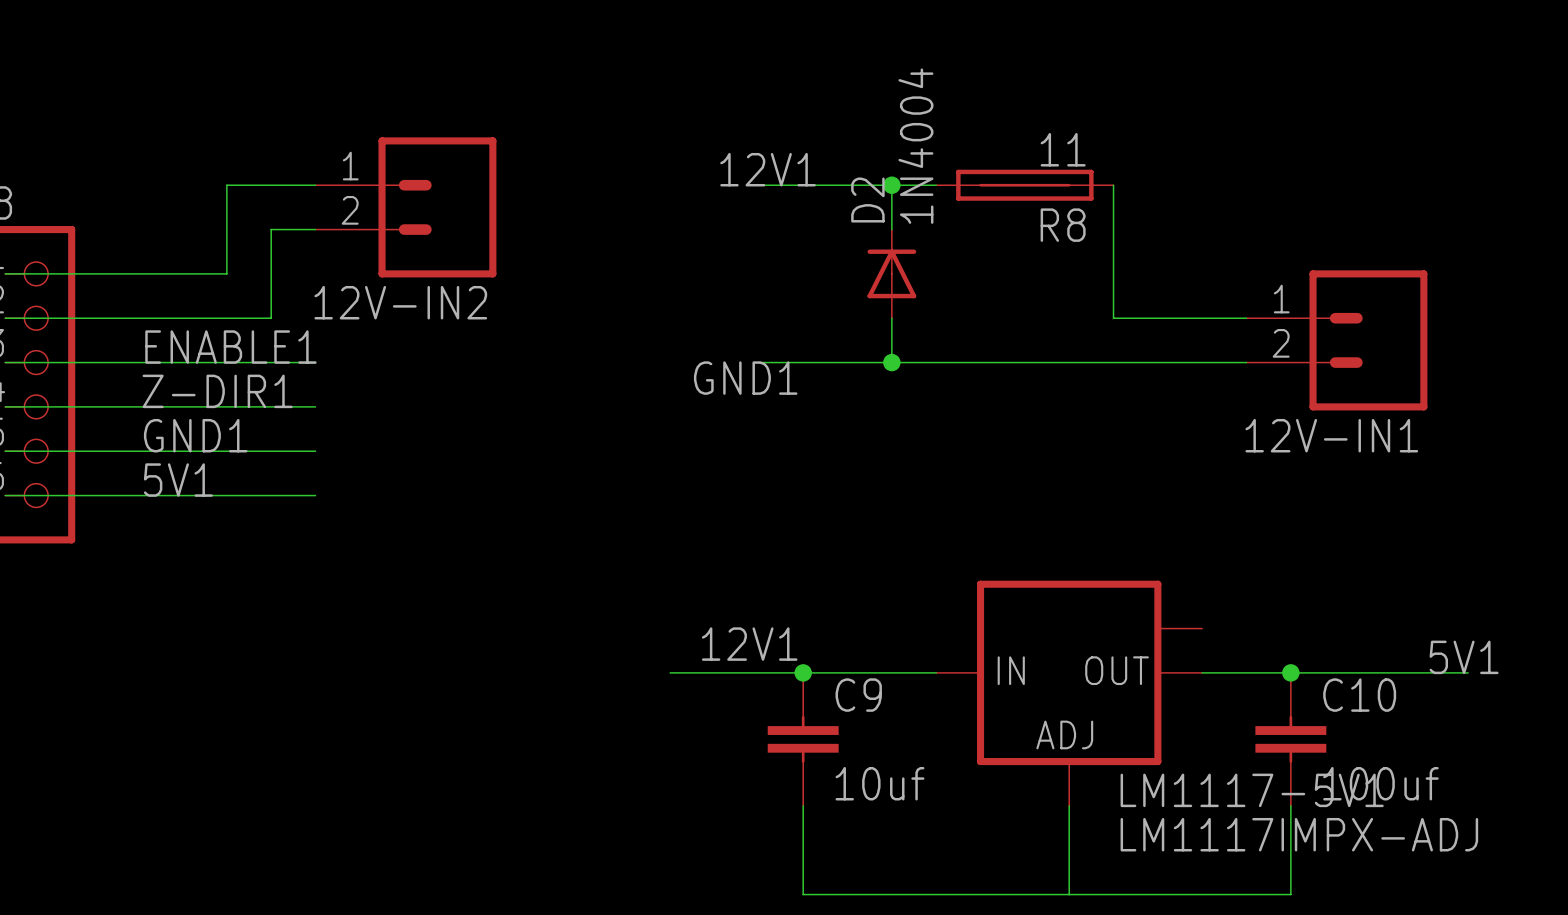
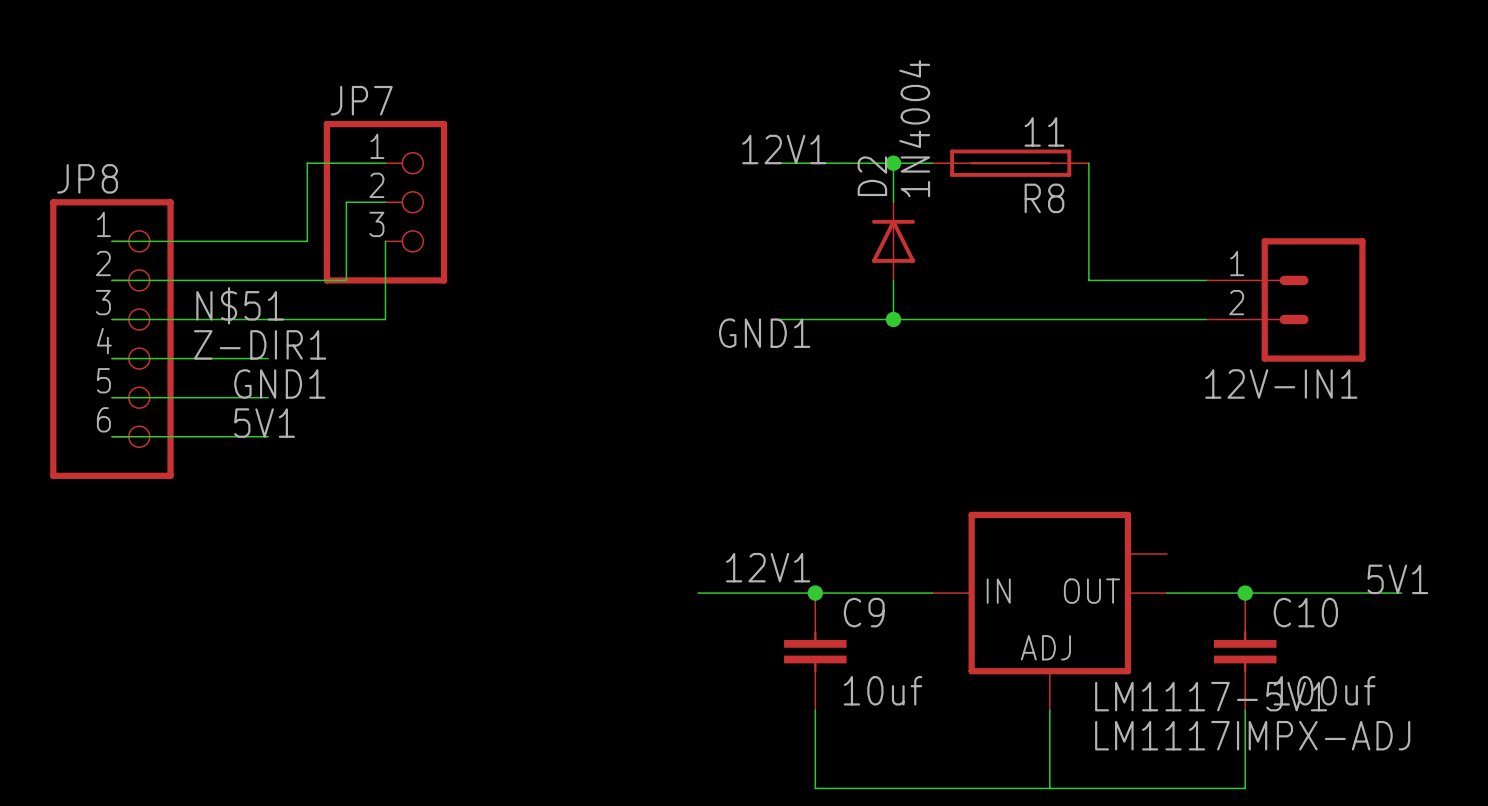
12V-IN2: (405, 207) -> none
JP7: none -> (385, 202)
wire: none -> (385, 241) (385, 319)
label: none -> N$51 (240, 305)
label: ENABLE1 (230, 347) -> none
label position: Z-DIR1 (217, 391) -> Z-DIR1 (260, 344)
wire: (182, 406) (315, 406) -> none
wire: (182, 451) (315, 451) -> none
wire: (182, 495) (315, 495) -> none

